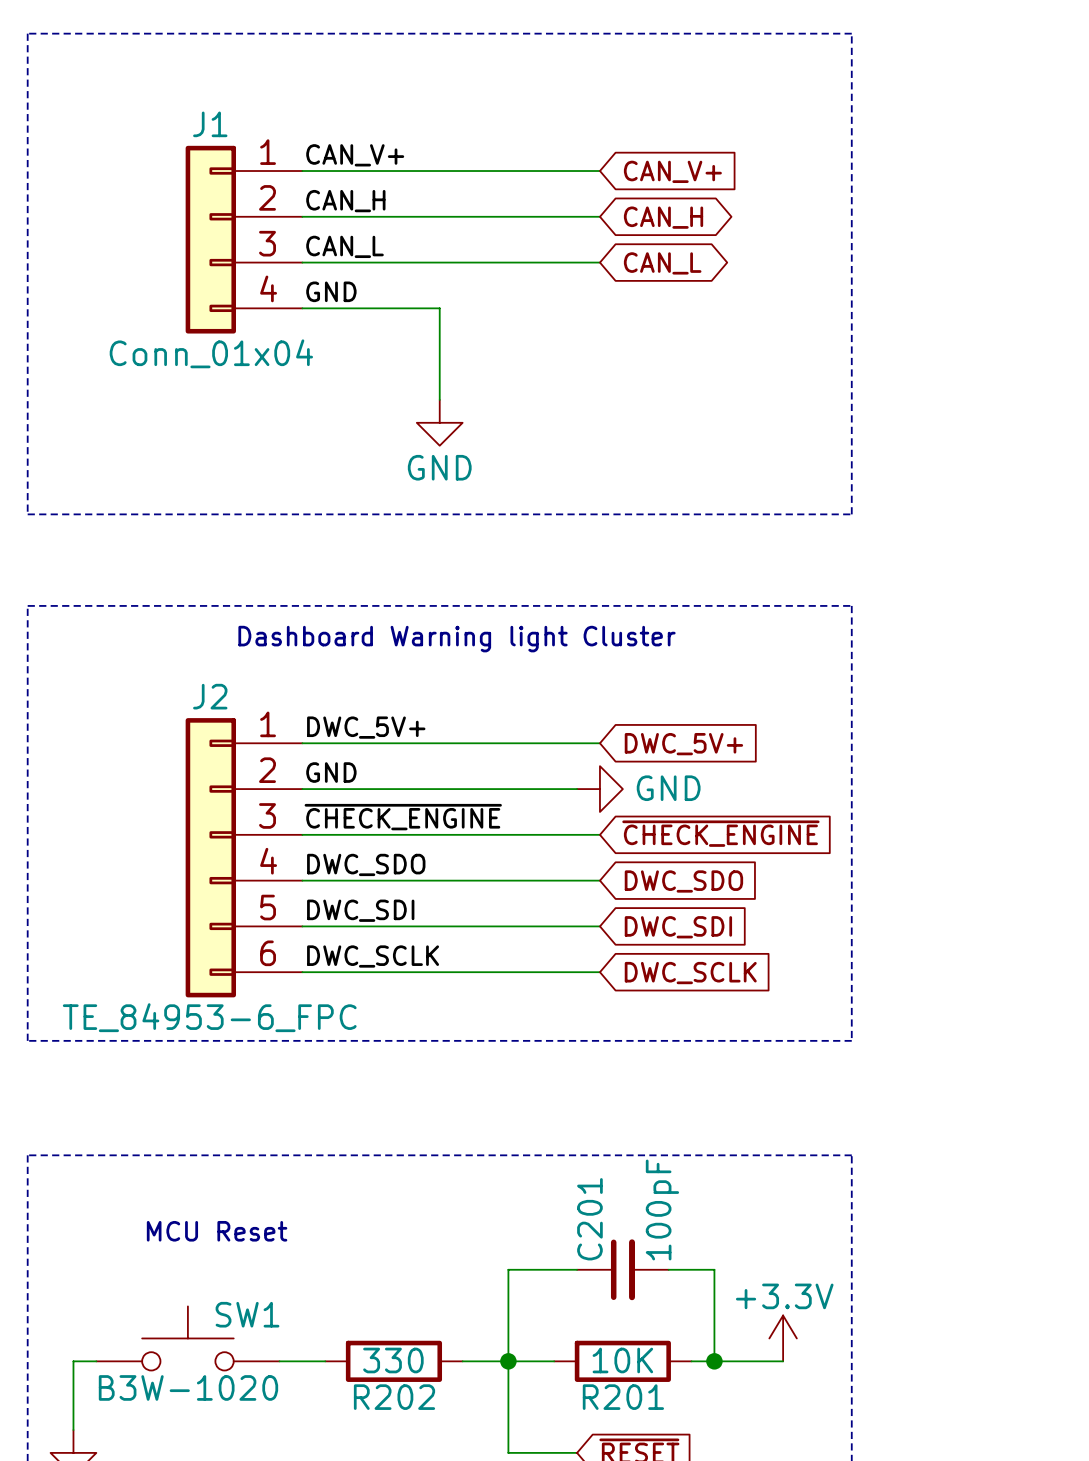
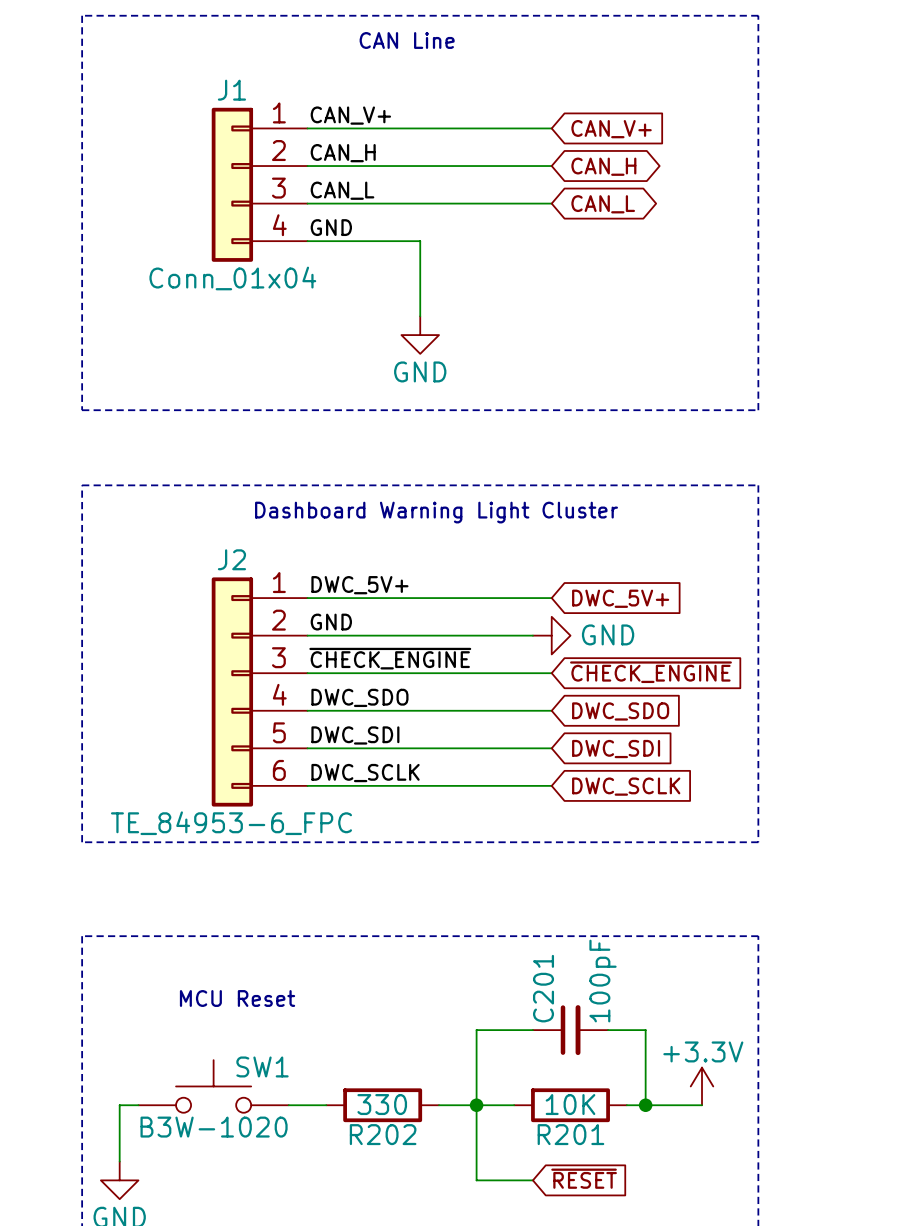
text: none -> CAN Line (407, 40)
text: Dashboard Warning light Cluster (457, 639) -> Dashboard Warning Light Cluster (436, 512)

